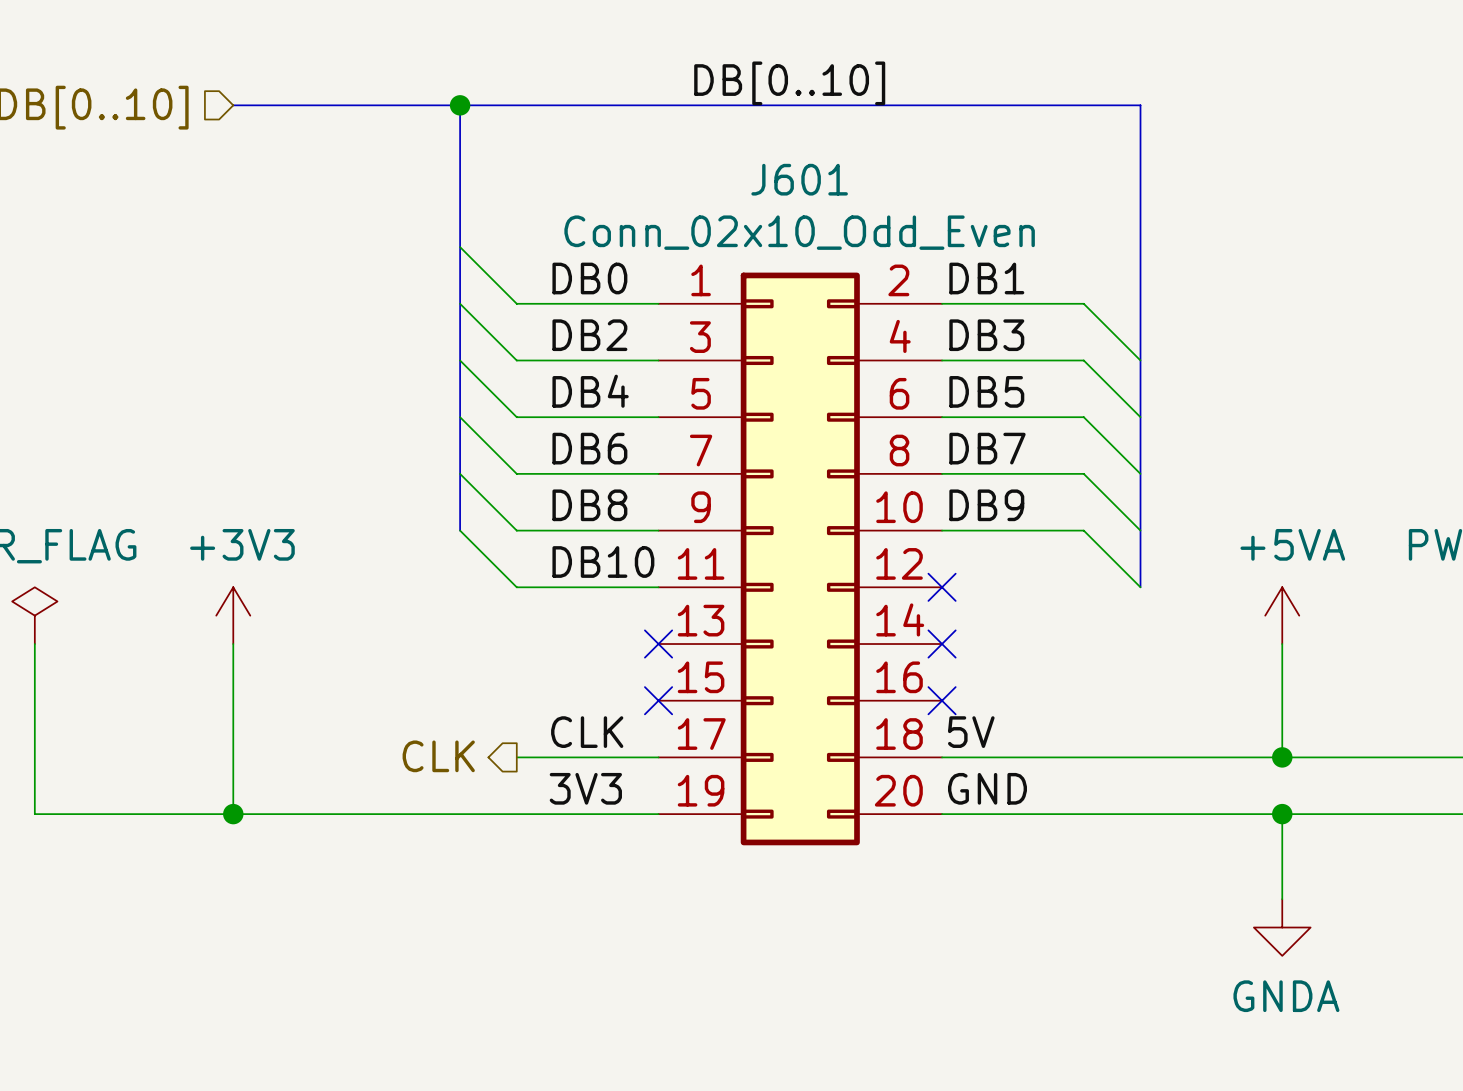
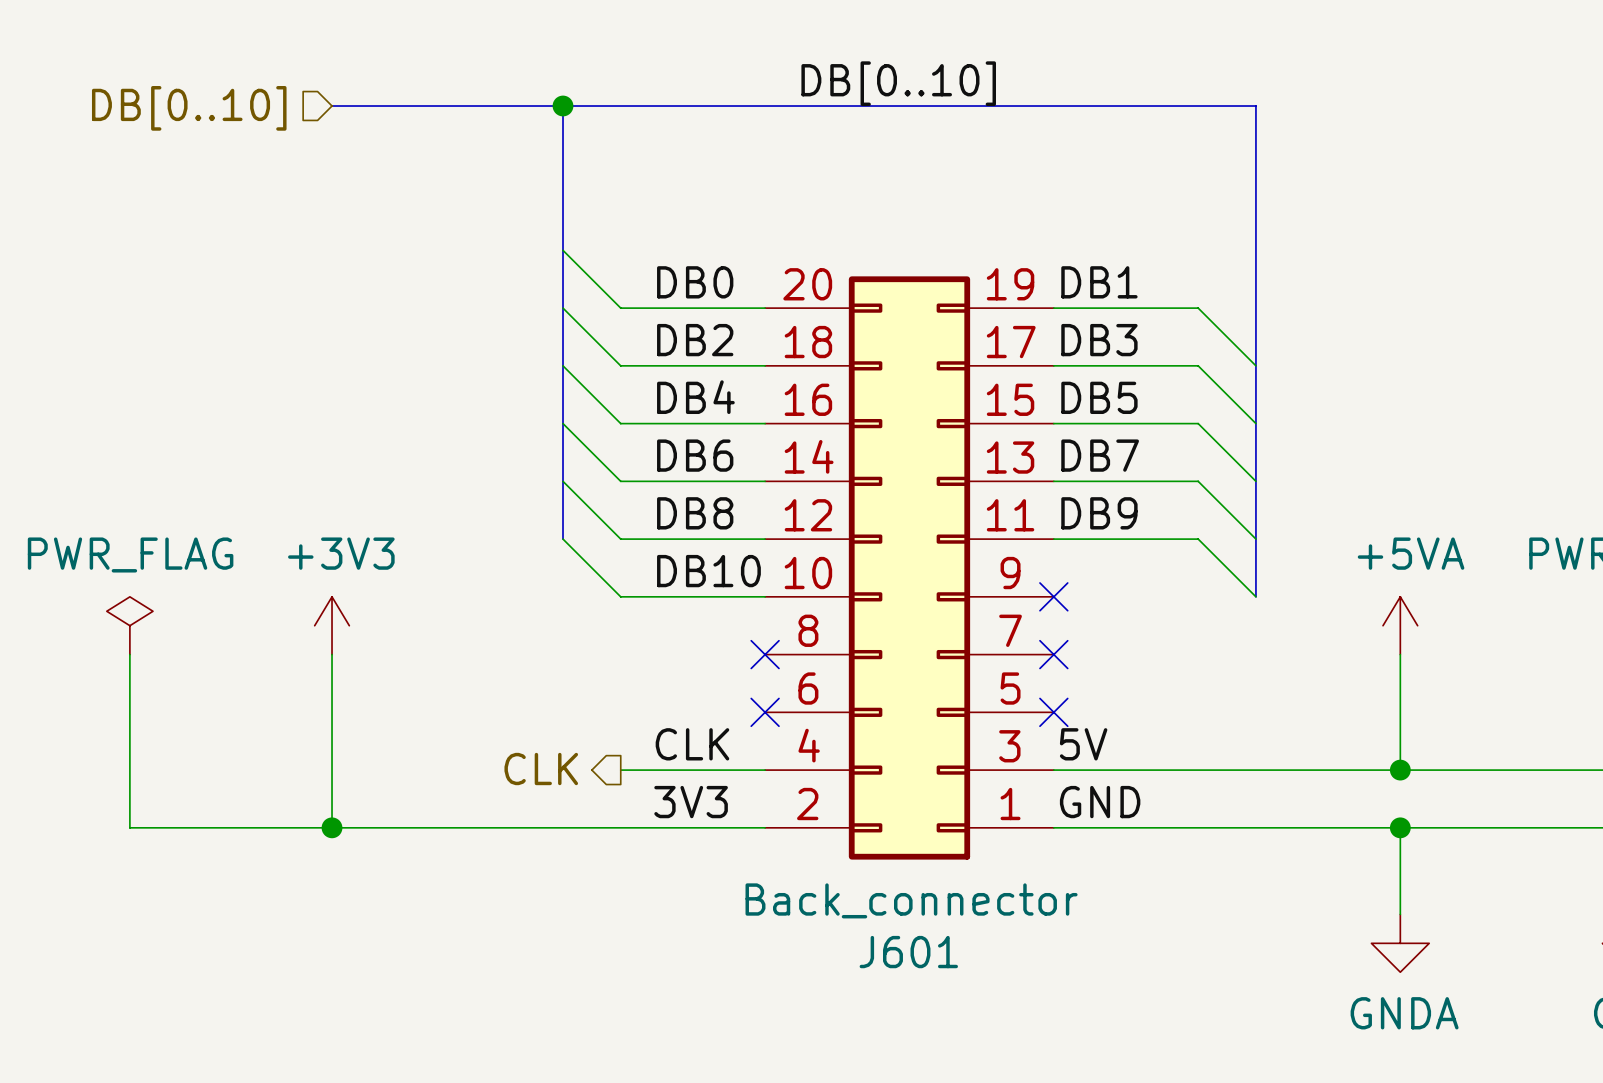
J601 value: Conn_02x10_Odd_Even (799, 232) -> Back_connector (911, 900)
J601 rotation: 0° (800, 558) -> 180° (909, 567)

